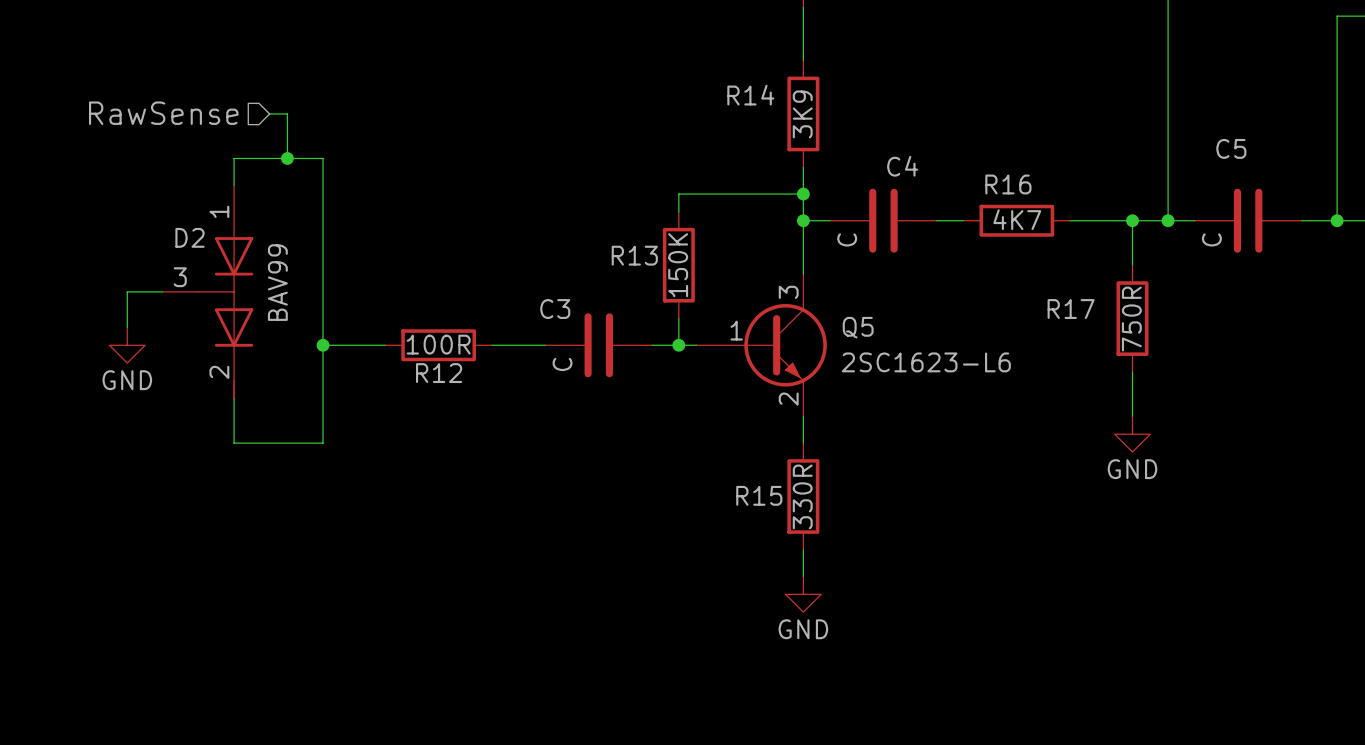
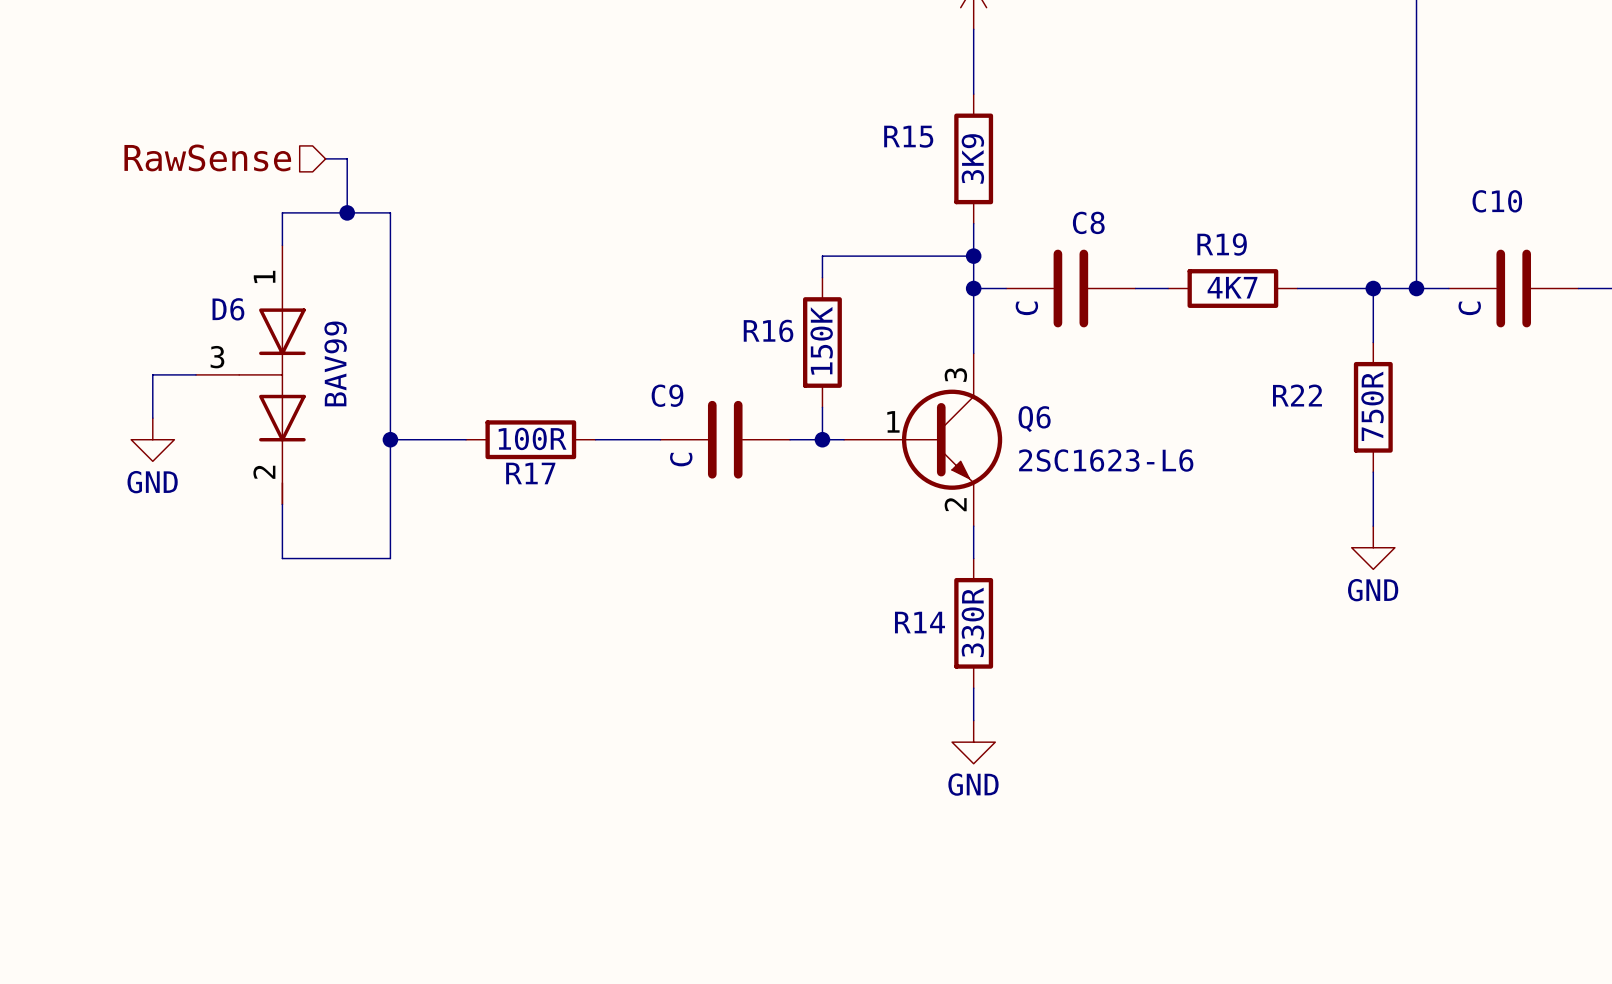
R14 name: R14 (750, 95) -> R15 (908, 136)
C5 name: C5 (1231, 148) -> C10 (1497, 201)
C4 name: C4 (902, 166) -> C8 (1088, 222)
R16 name: R16 (1008, 184) -> R19 (1222, 244)
D2 name: D2 (190, 237) -> D6 (228, 309)
R13 name: R13 (634, 255) -> R16 (768, 330)
C3 name: C3 (555, 309) -> C9 (667, 395)
R17 name: R17 (1071, 309) -> R22 (1297, 395)
Q5 name: Q5 (858, 327) -> Q6 (1034, 419)
R12 name: R12 (439, 373) -> R17 (530, 473)
R15 name: R15 (759, 495) -> R14 (919, 622)

